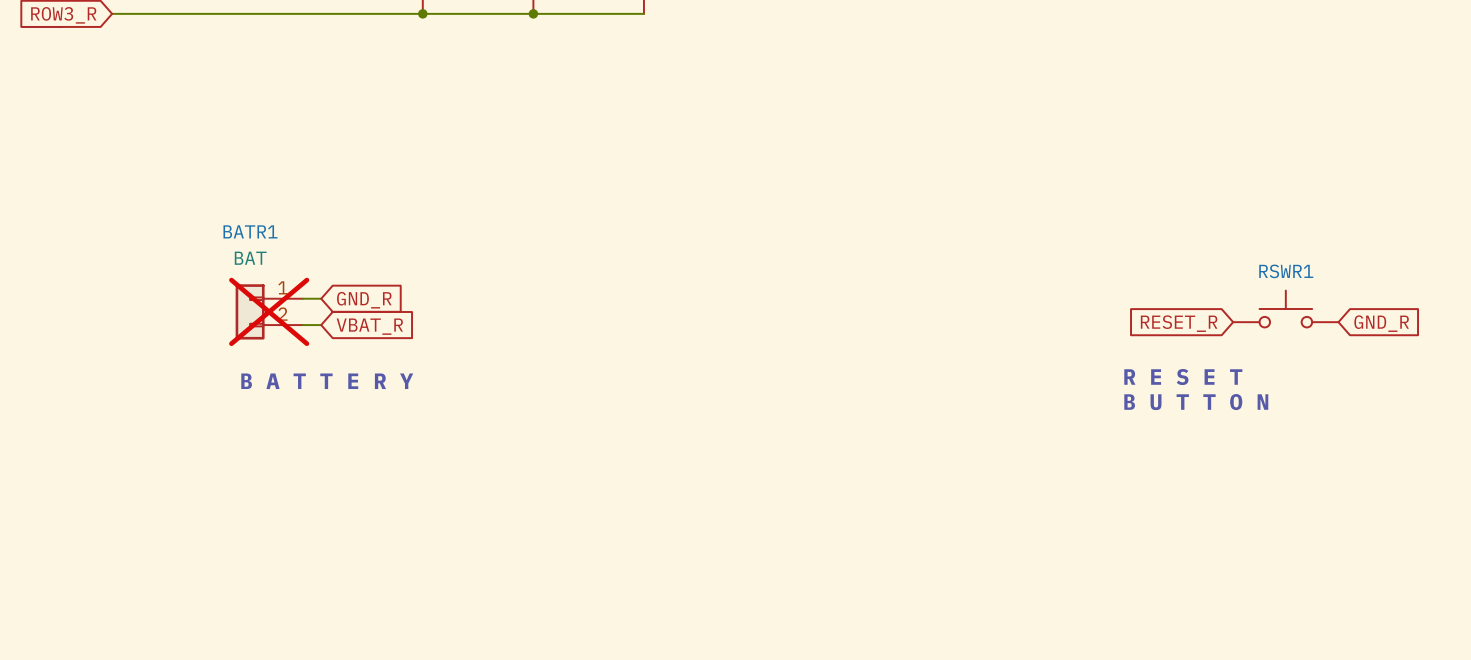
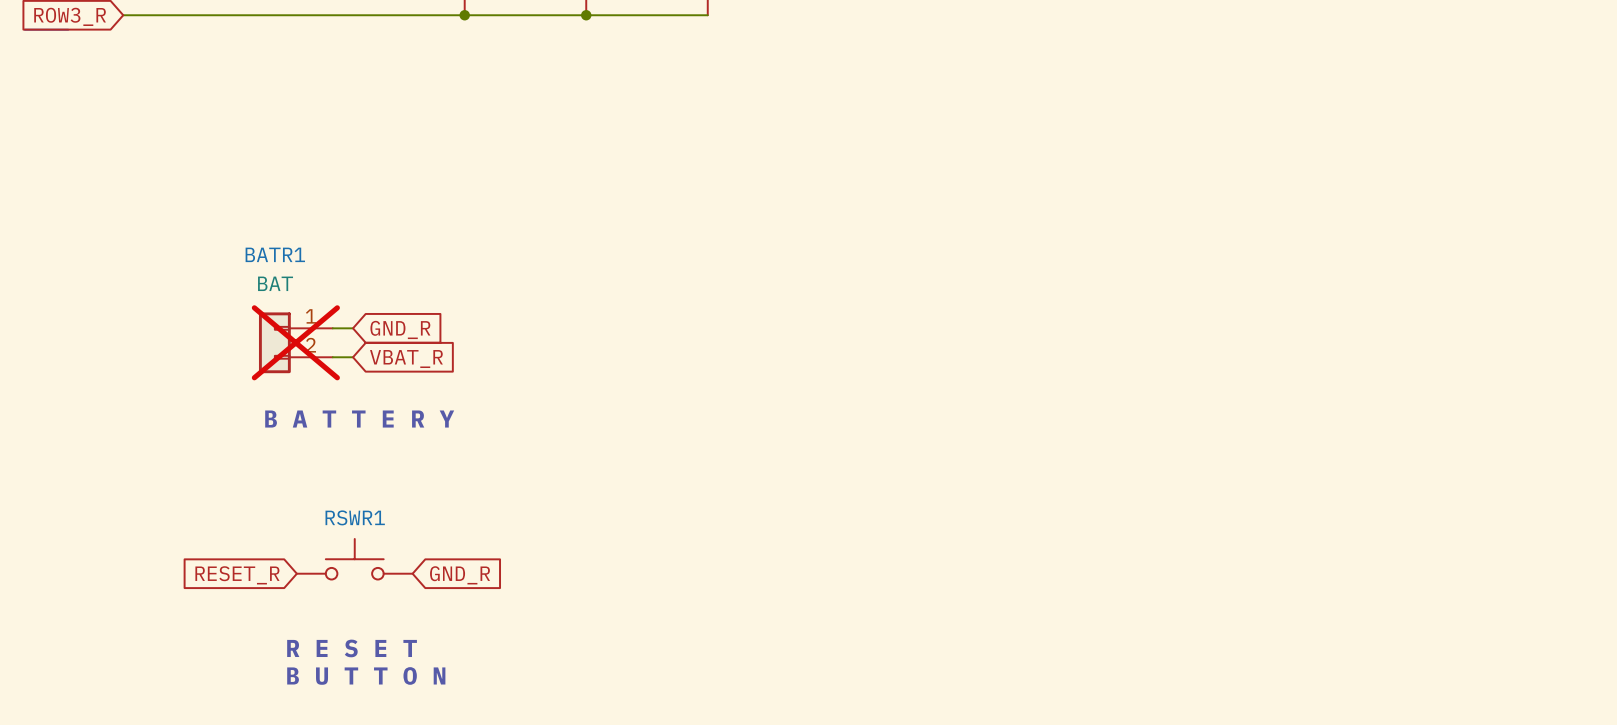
RSWR1 position: (1285, 309) -> (354, 559)
global label: RESET_R (1179, 323) -> none
global label: GND_R (1381, 323) -> none
text: R E S E T (1183, 377) -> none
text: B U T T O N (1196, 402) -> none
global label: none -> RESET_R (237, 575)
global label: none -> GND_R (460, 575)
text: none -> R E S E T (352, 648)
text: none -> B U T T O N (366, 675)

